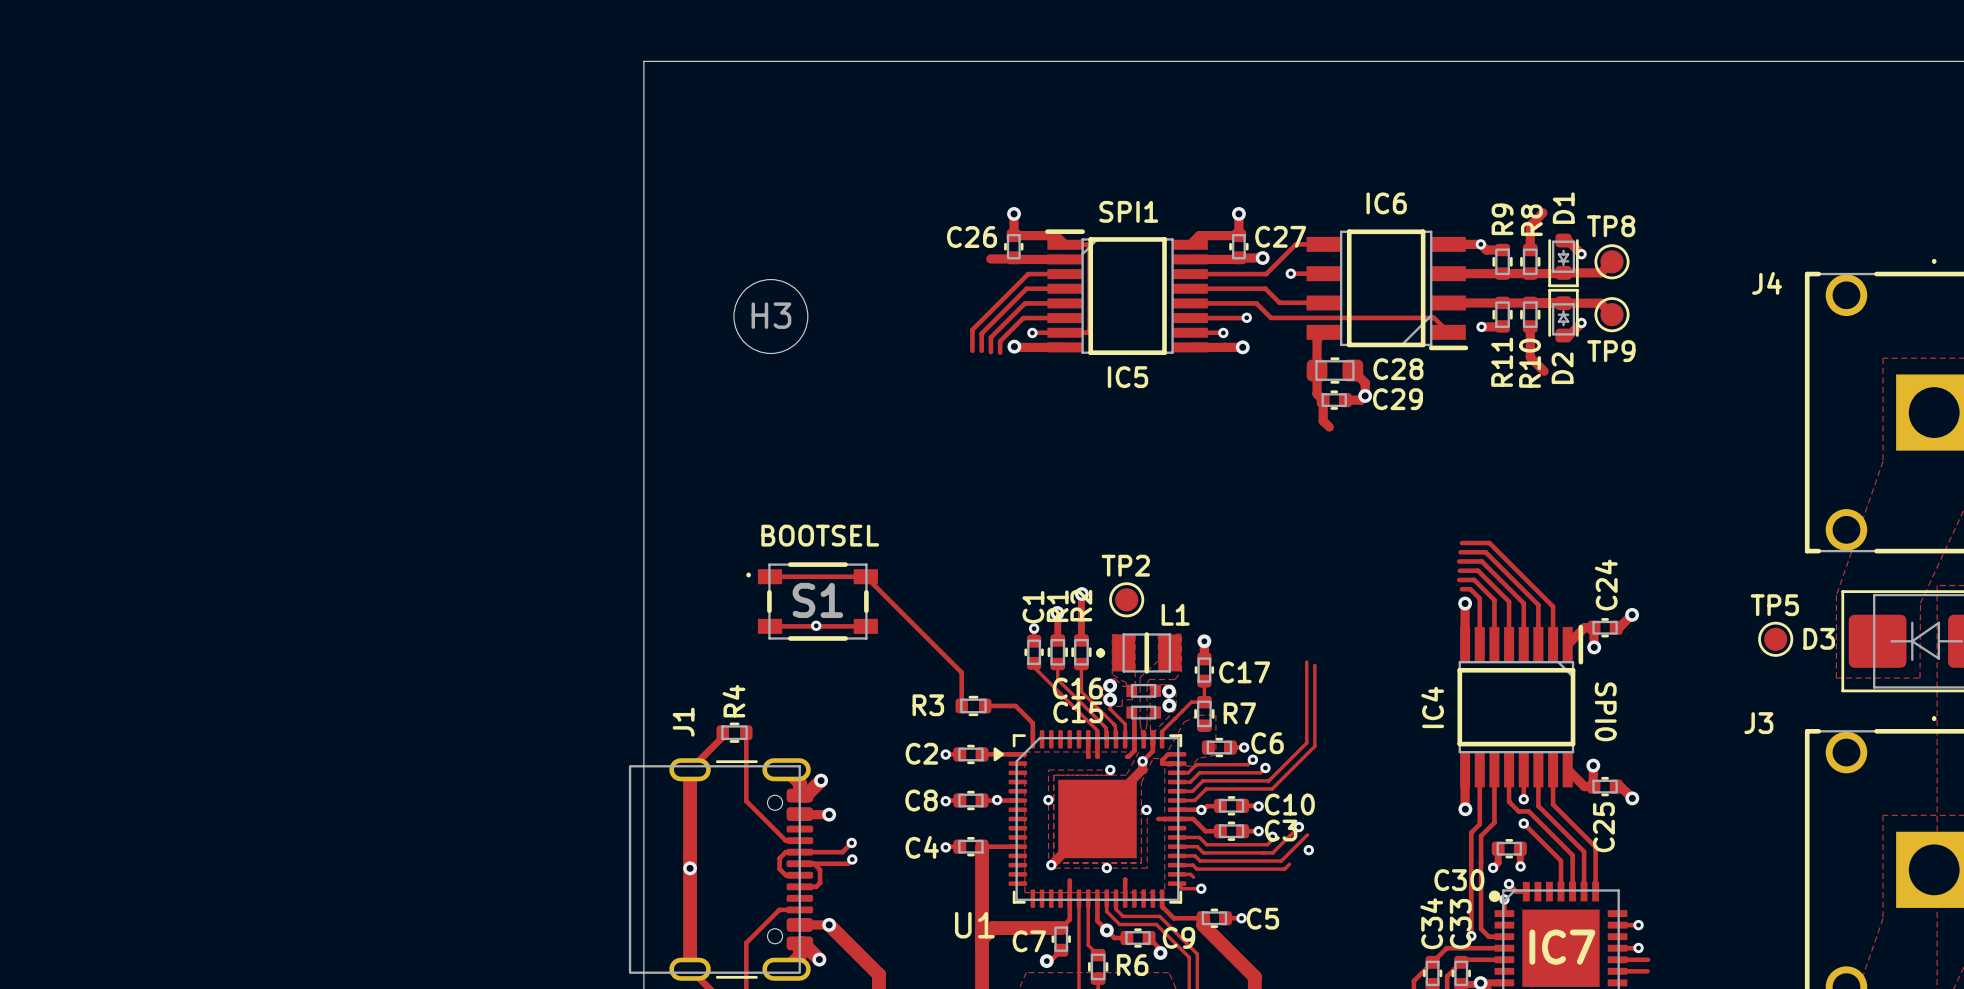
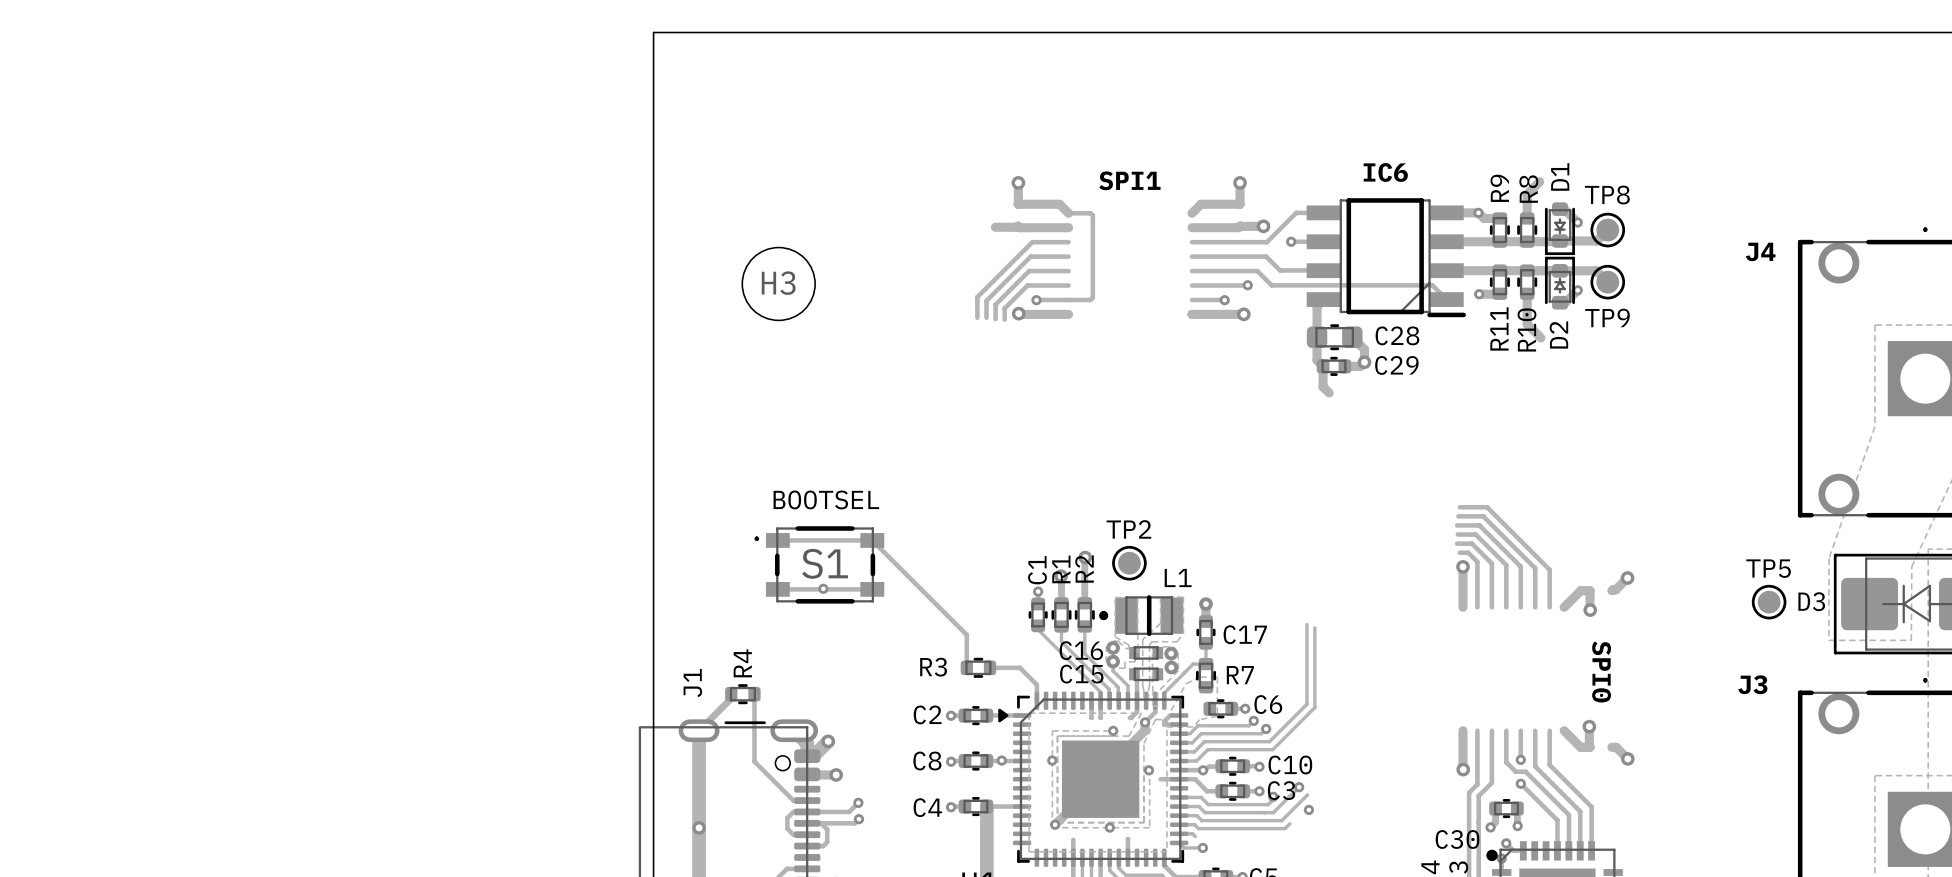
C26: (1013, 246) -> none
C27: (1238, 246) -> none
IC5: (1126, 292) -> none
C24: (1605, 627) -> none
IC4: (1520, 706) -> none
C25: (1605, 786) -> none

